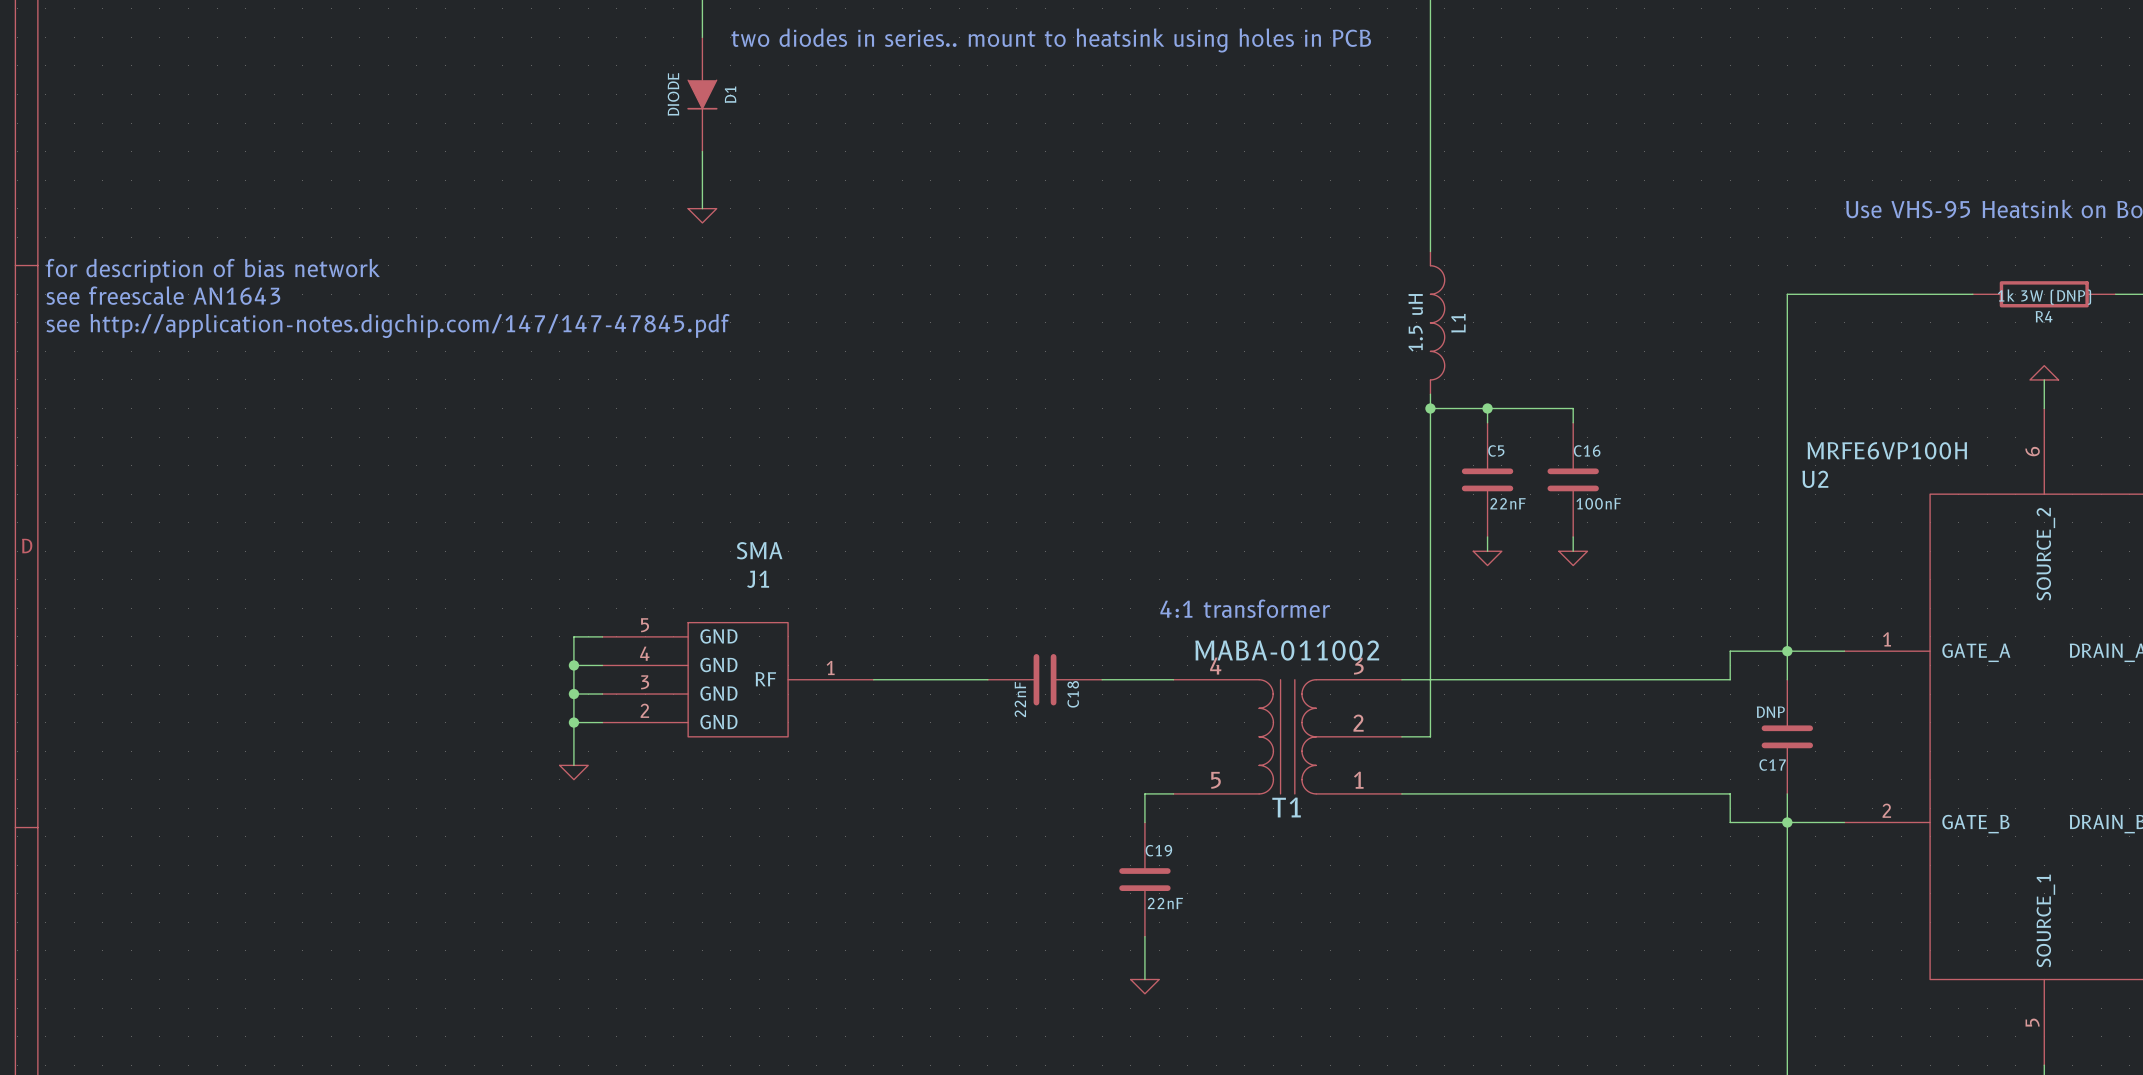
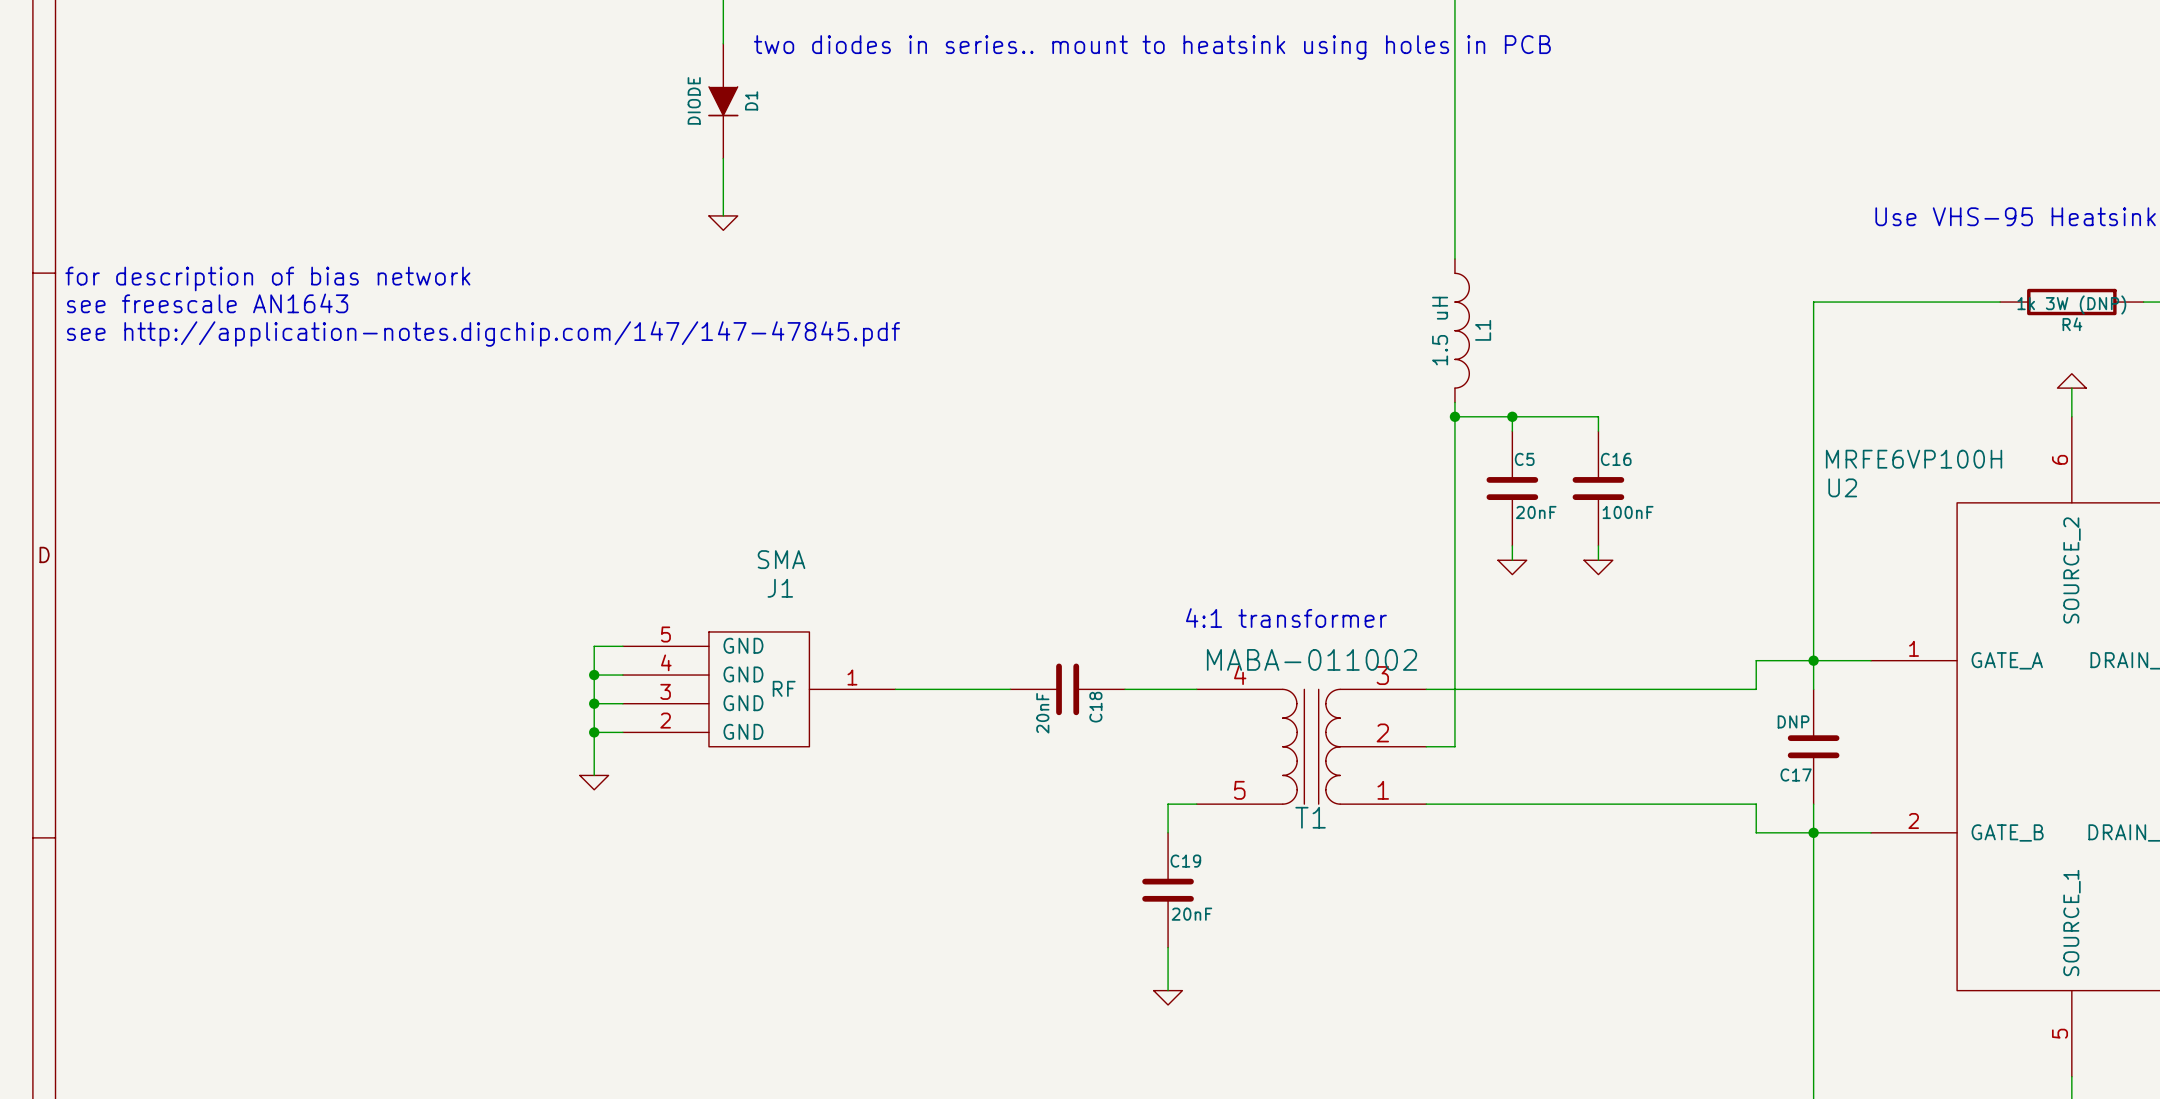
C5 value: 22nF (1508, 503) -> 20nF (1536, 512)
C18 value: 22nF (1020, 699) -> 20nF (1042, 713)
C19 value: 22nF (1165, 903) -> 20nF (1191, 914)

